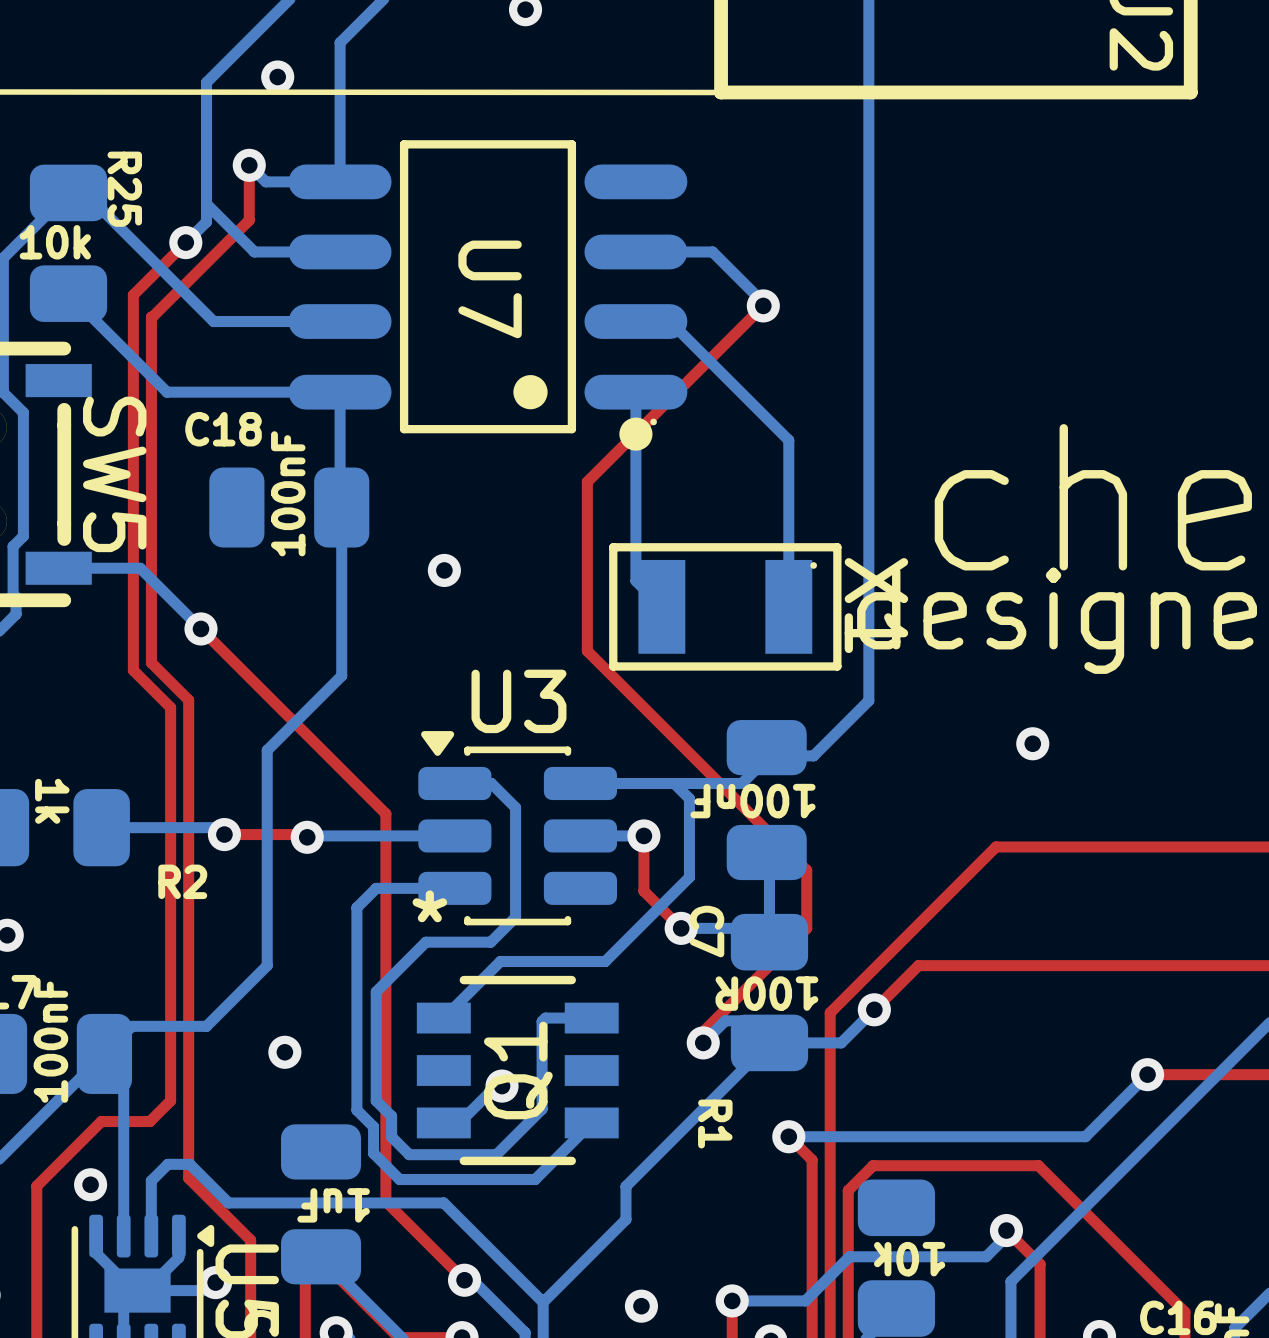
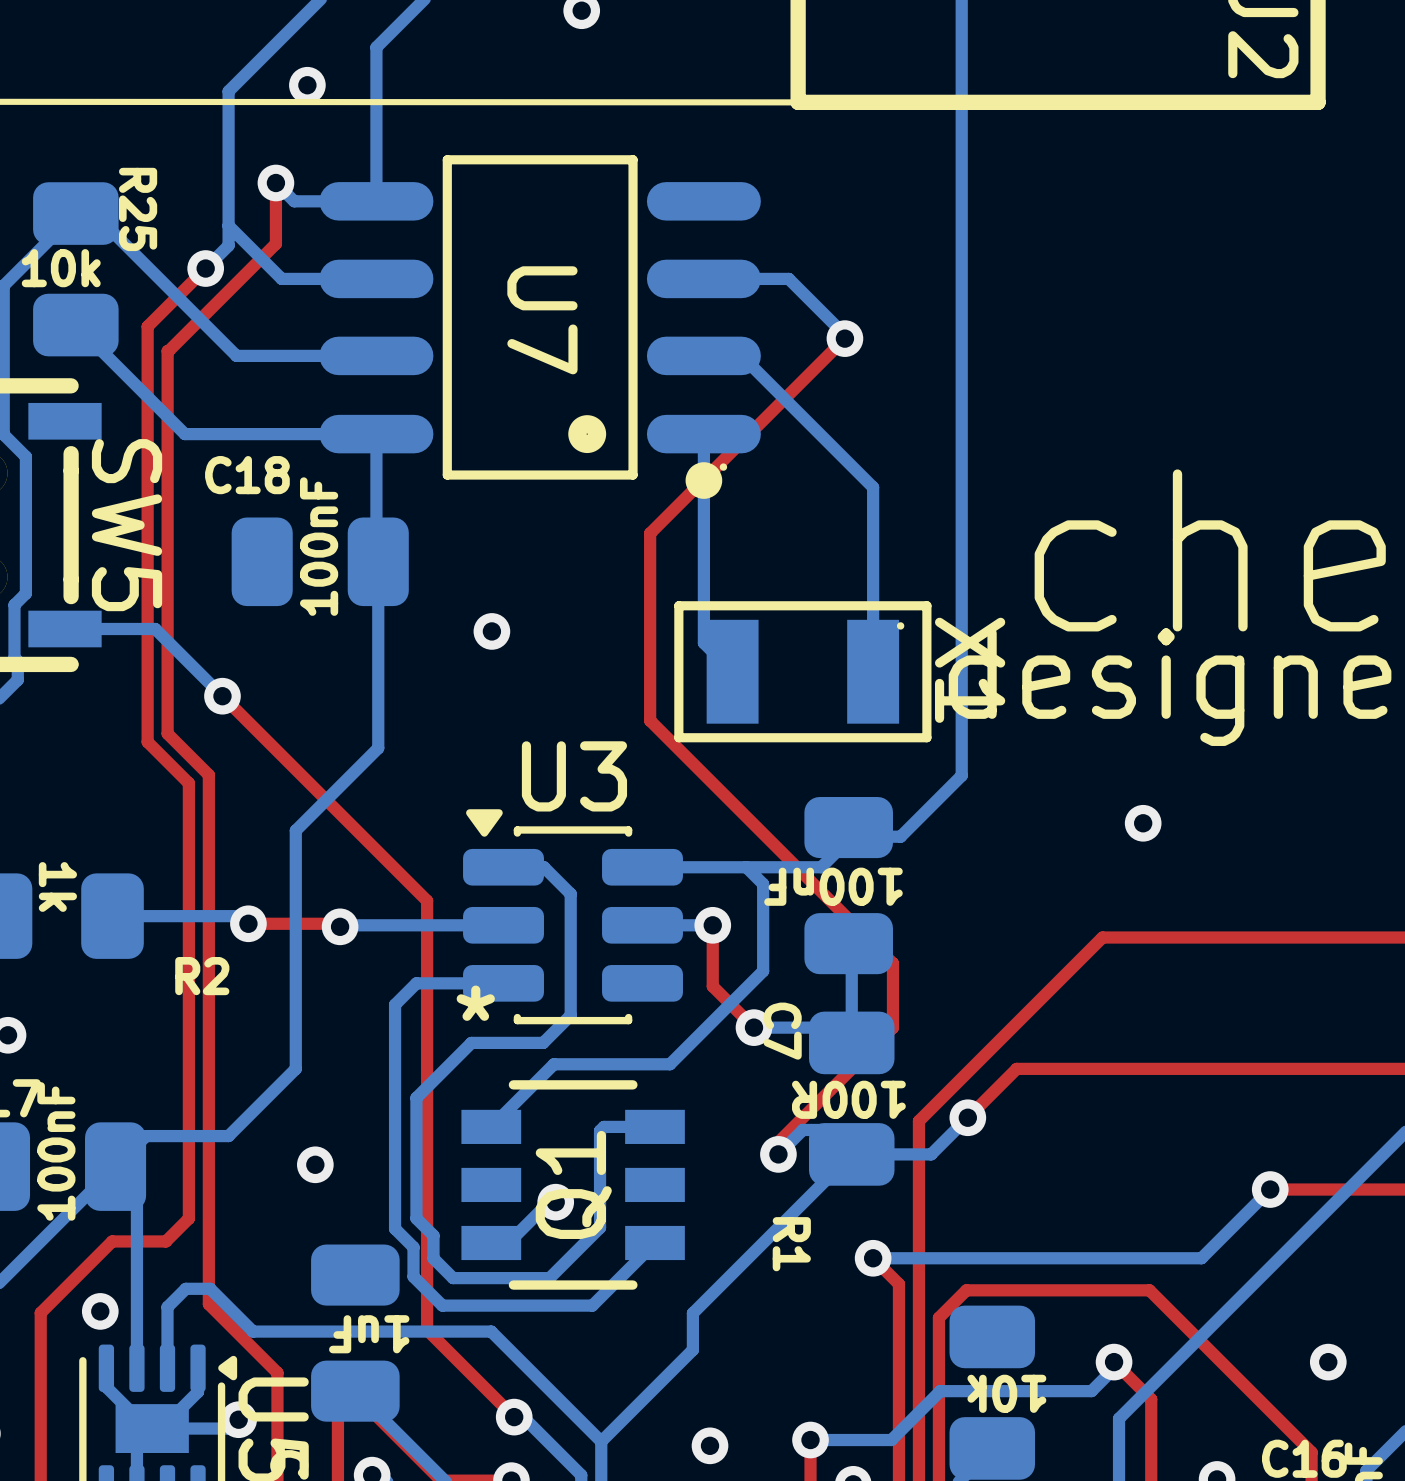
via: none -> (1328, 1362)

